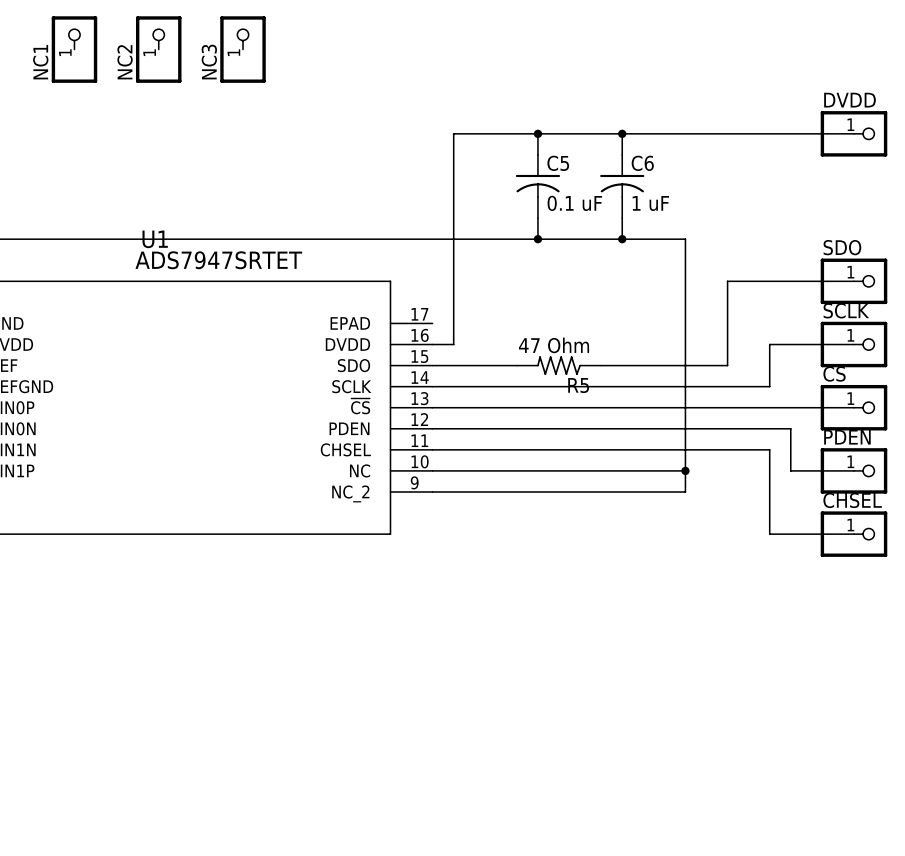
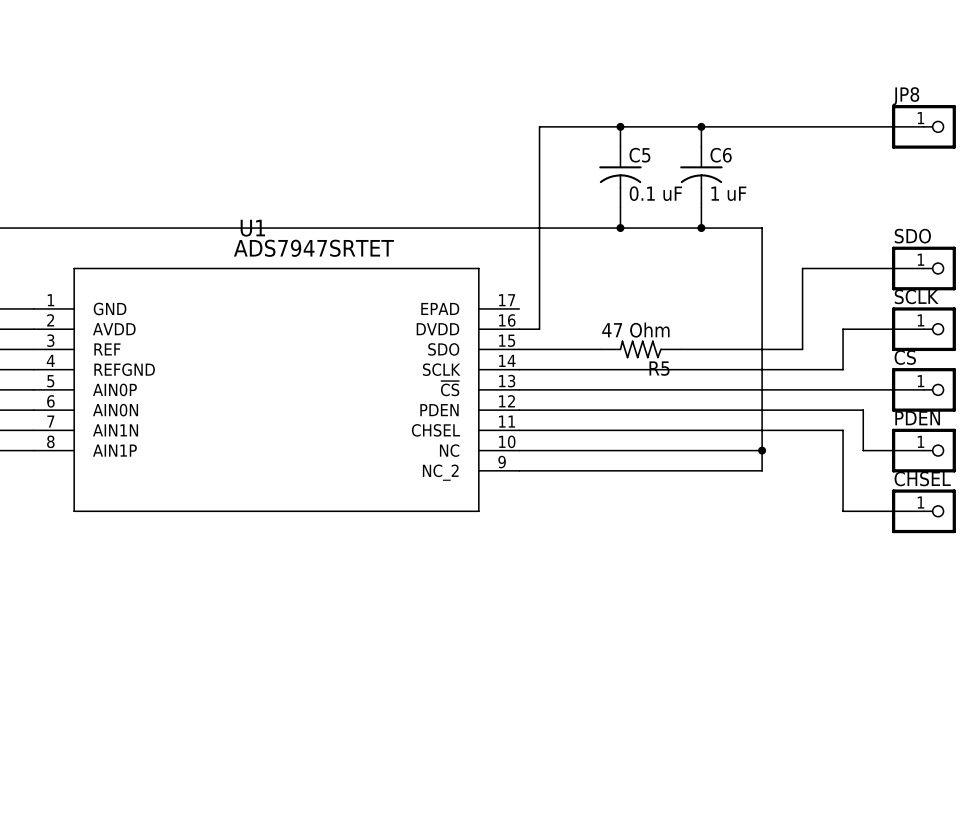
NC1: (74, 49) -> none
NC2: (158, 49) -> none
NC3: (243, 49) -> none
DVDD name: DVDD (849, 100) -> JP8 (905, 96)

